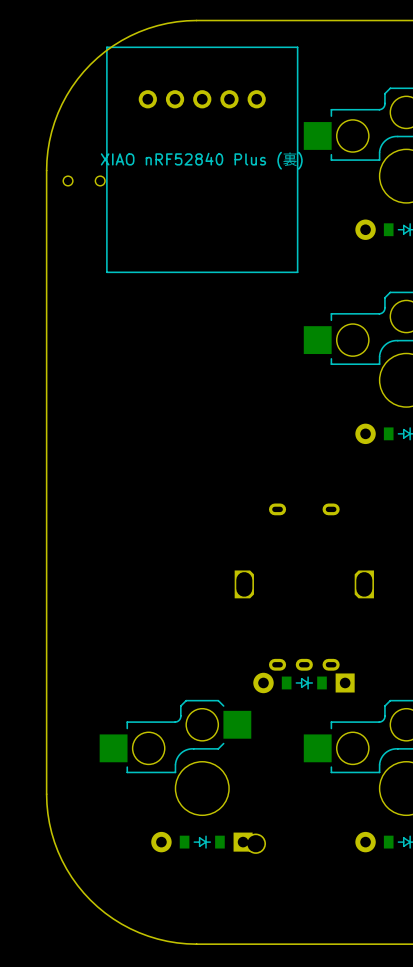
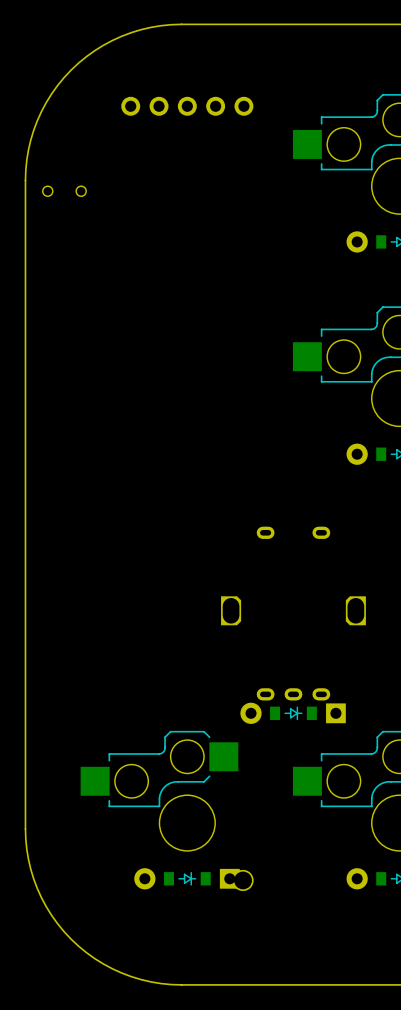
drawing: [106, 46, 299, 274] -> none

